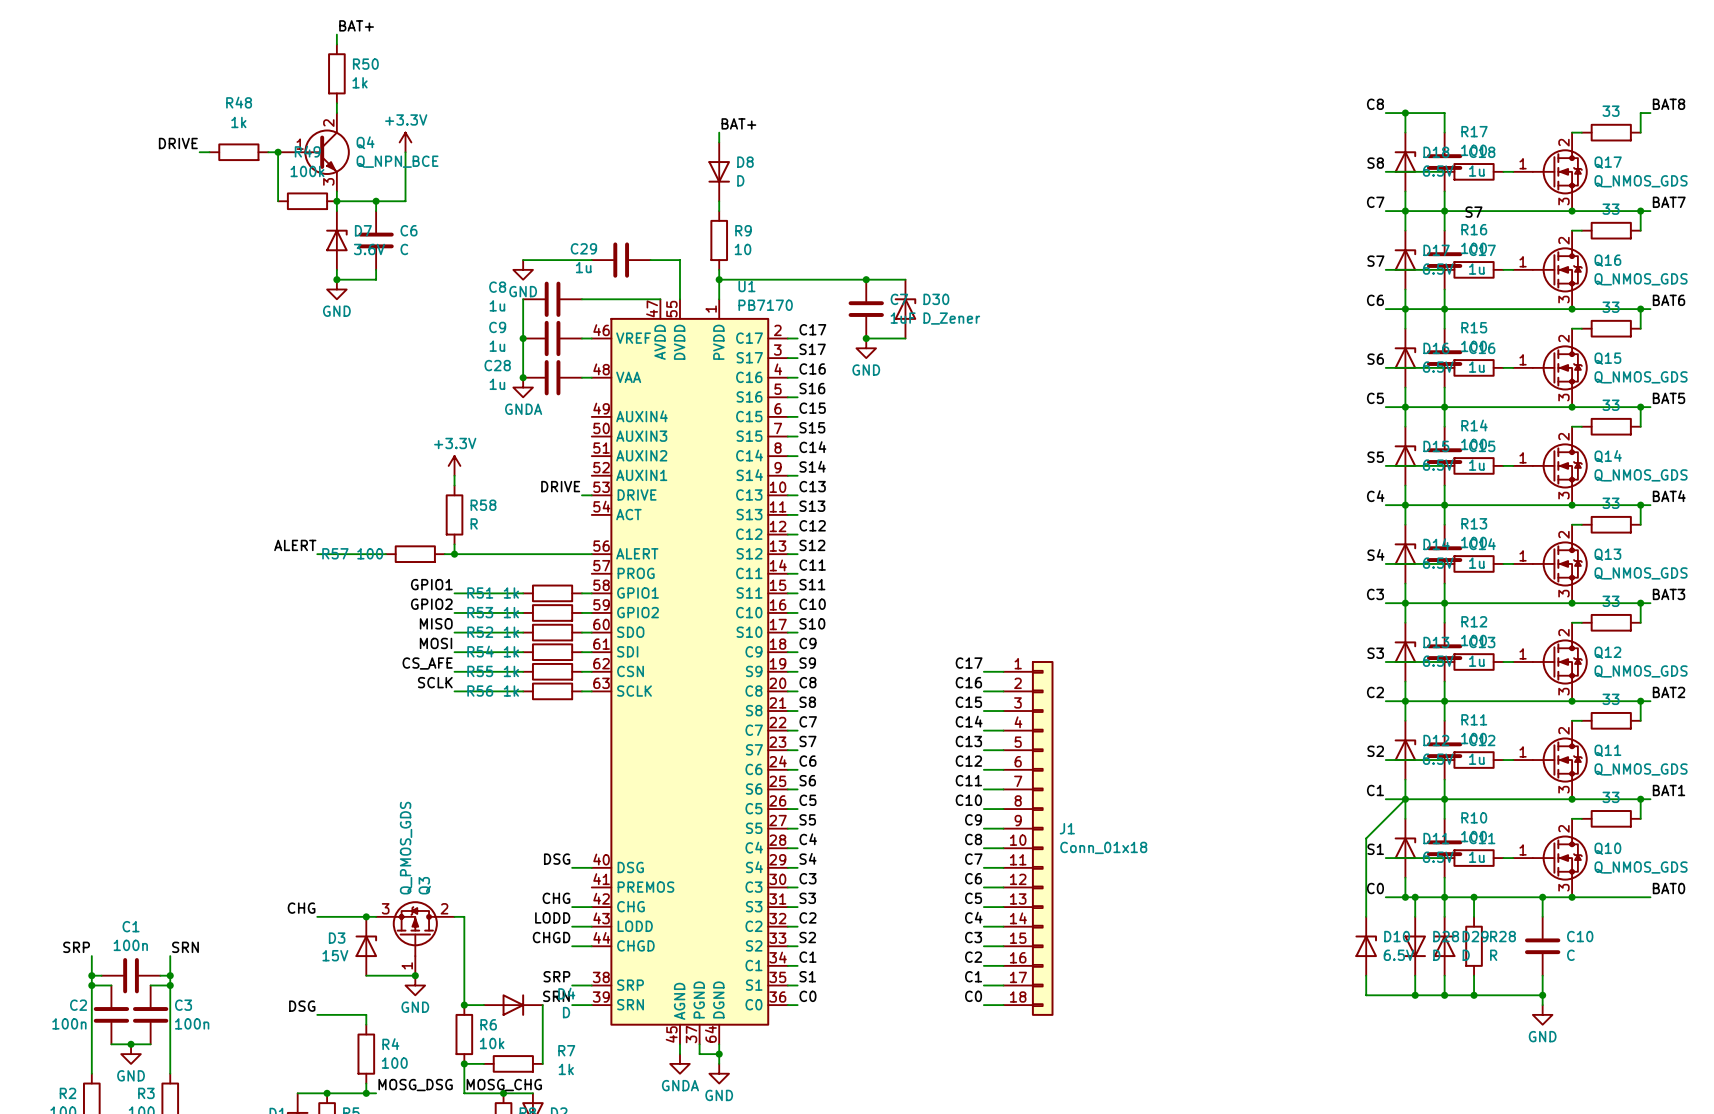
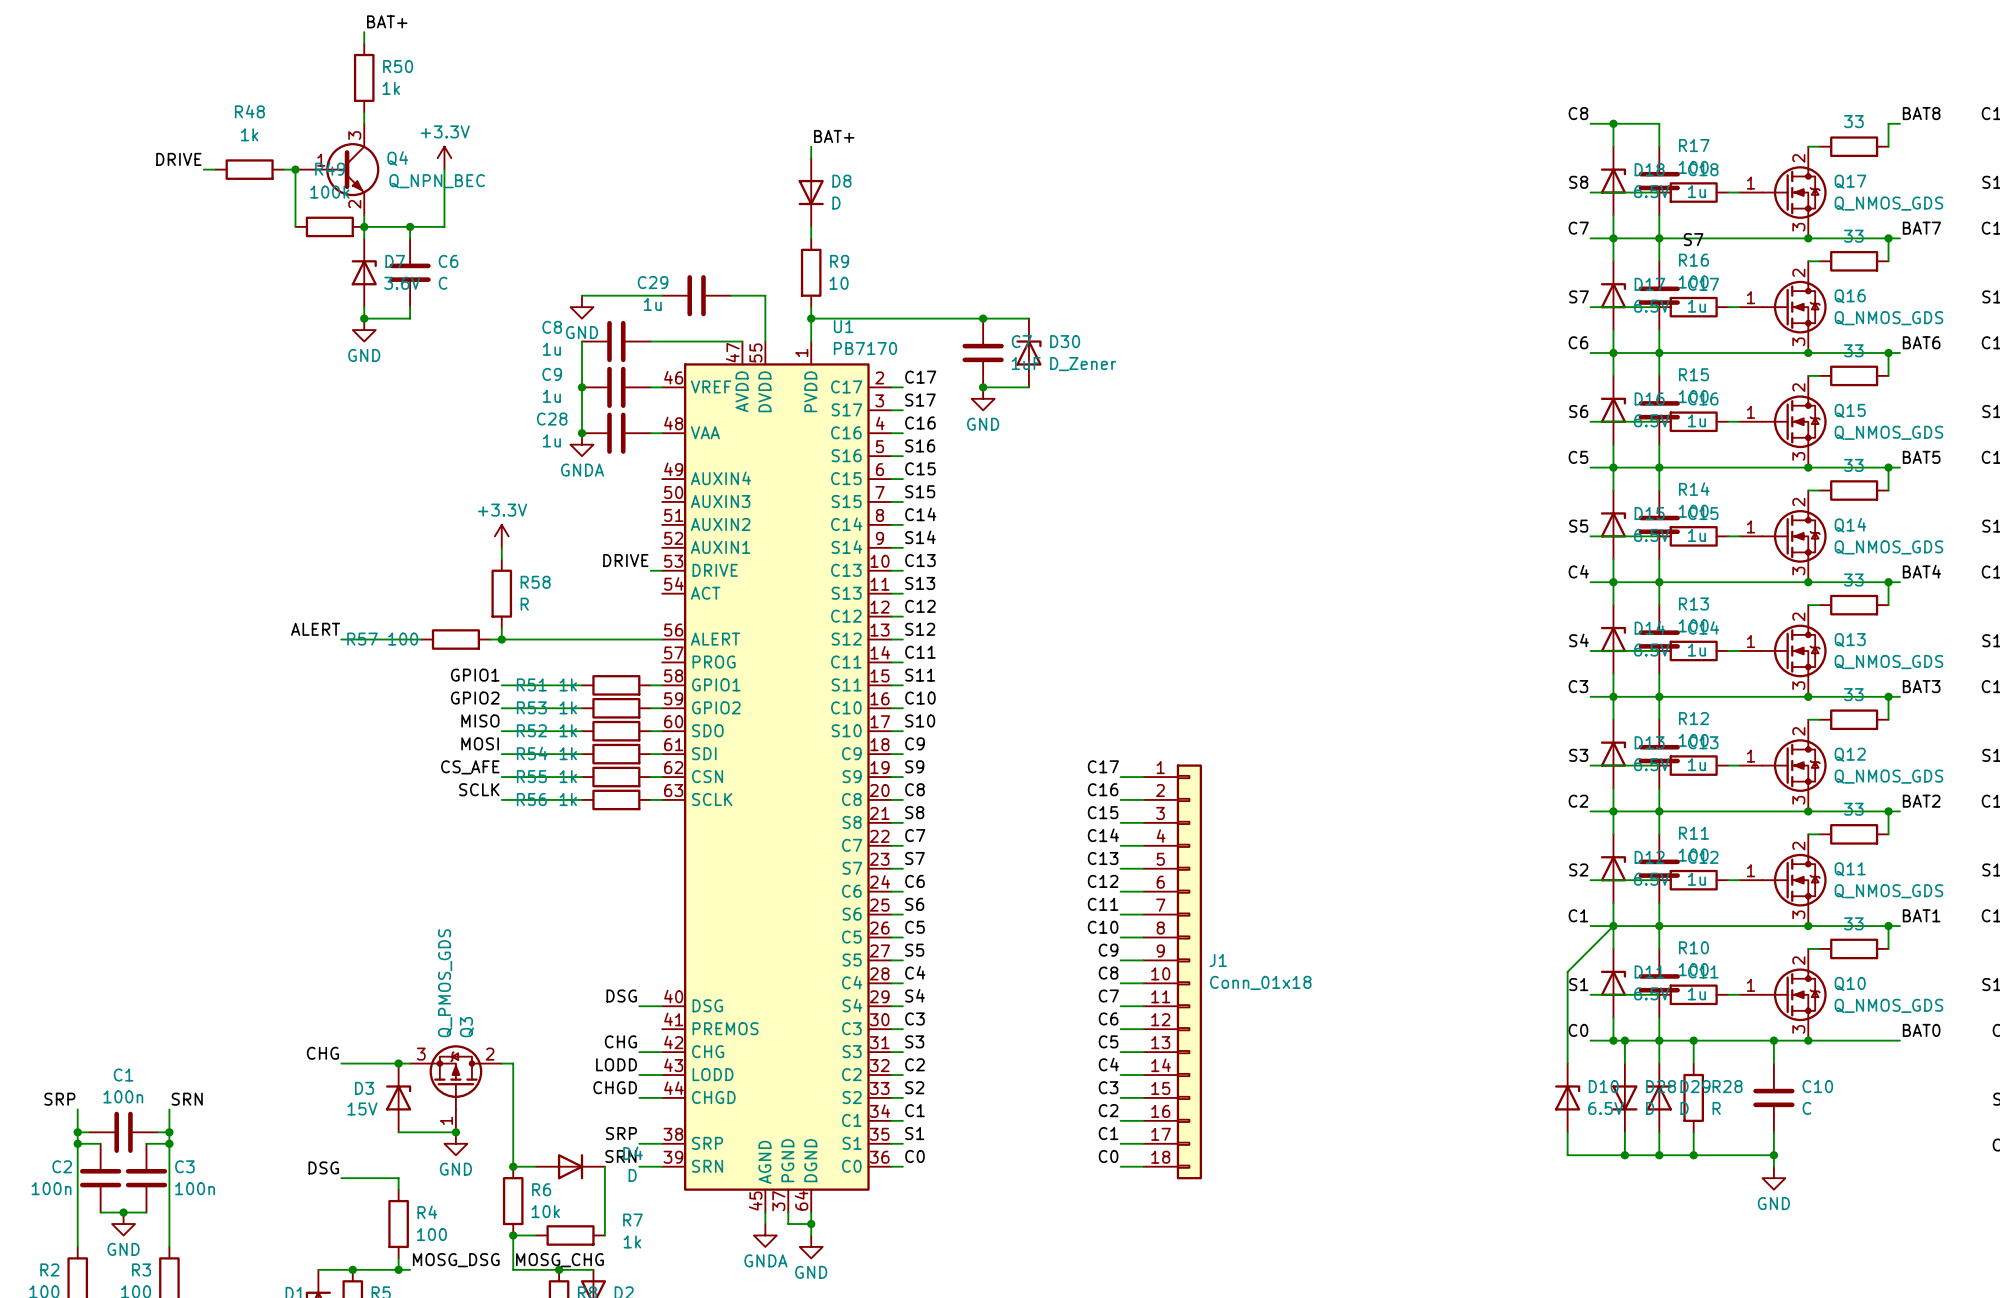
Q4 pin number: 2 (328, 123) -> 3 (354, 135)
Q4 value: Q_NPN_BCE (397, 161) -> Q_NPN_BEC (437, 181)
Q4 pin number: 3 (328, 181) -> 2 (354, 204)

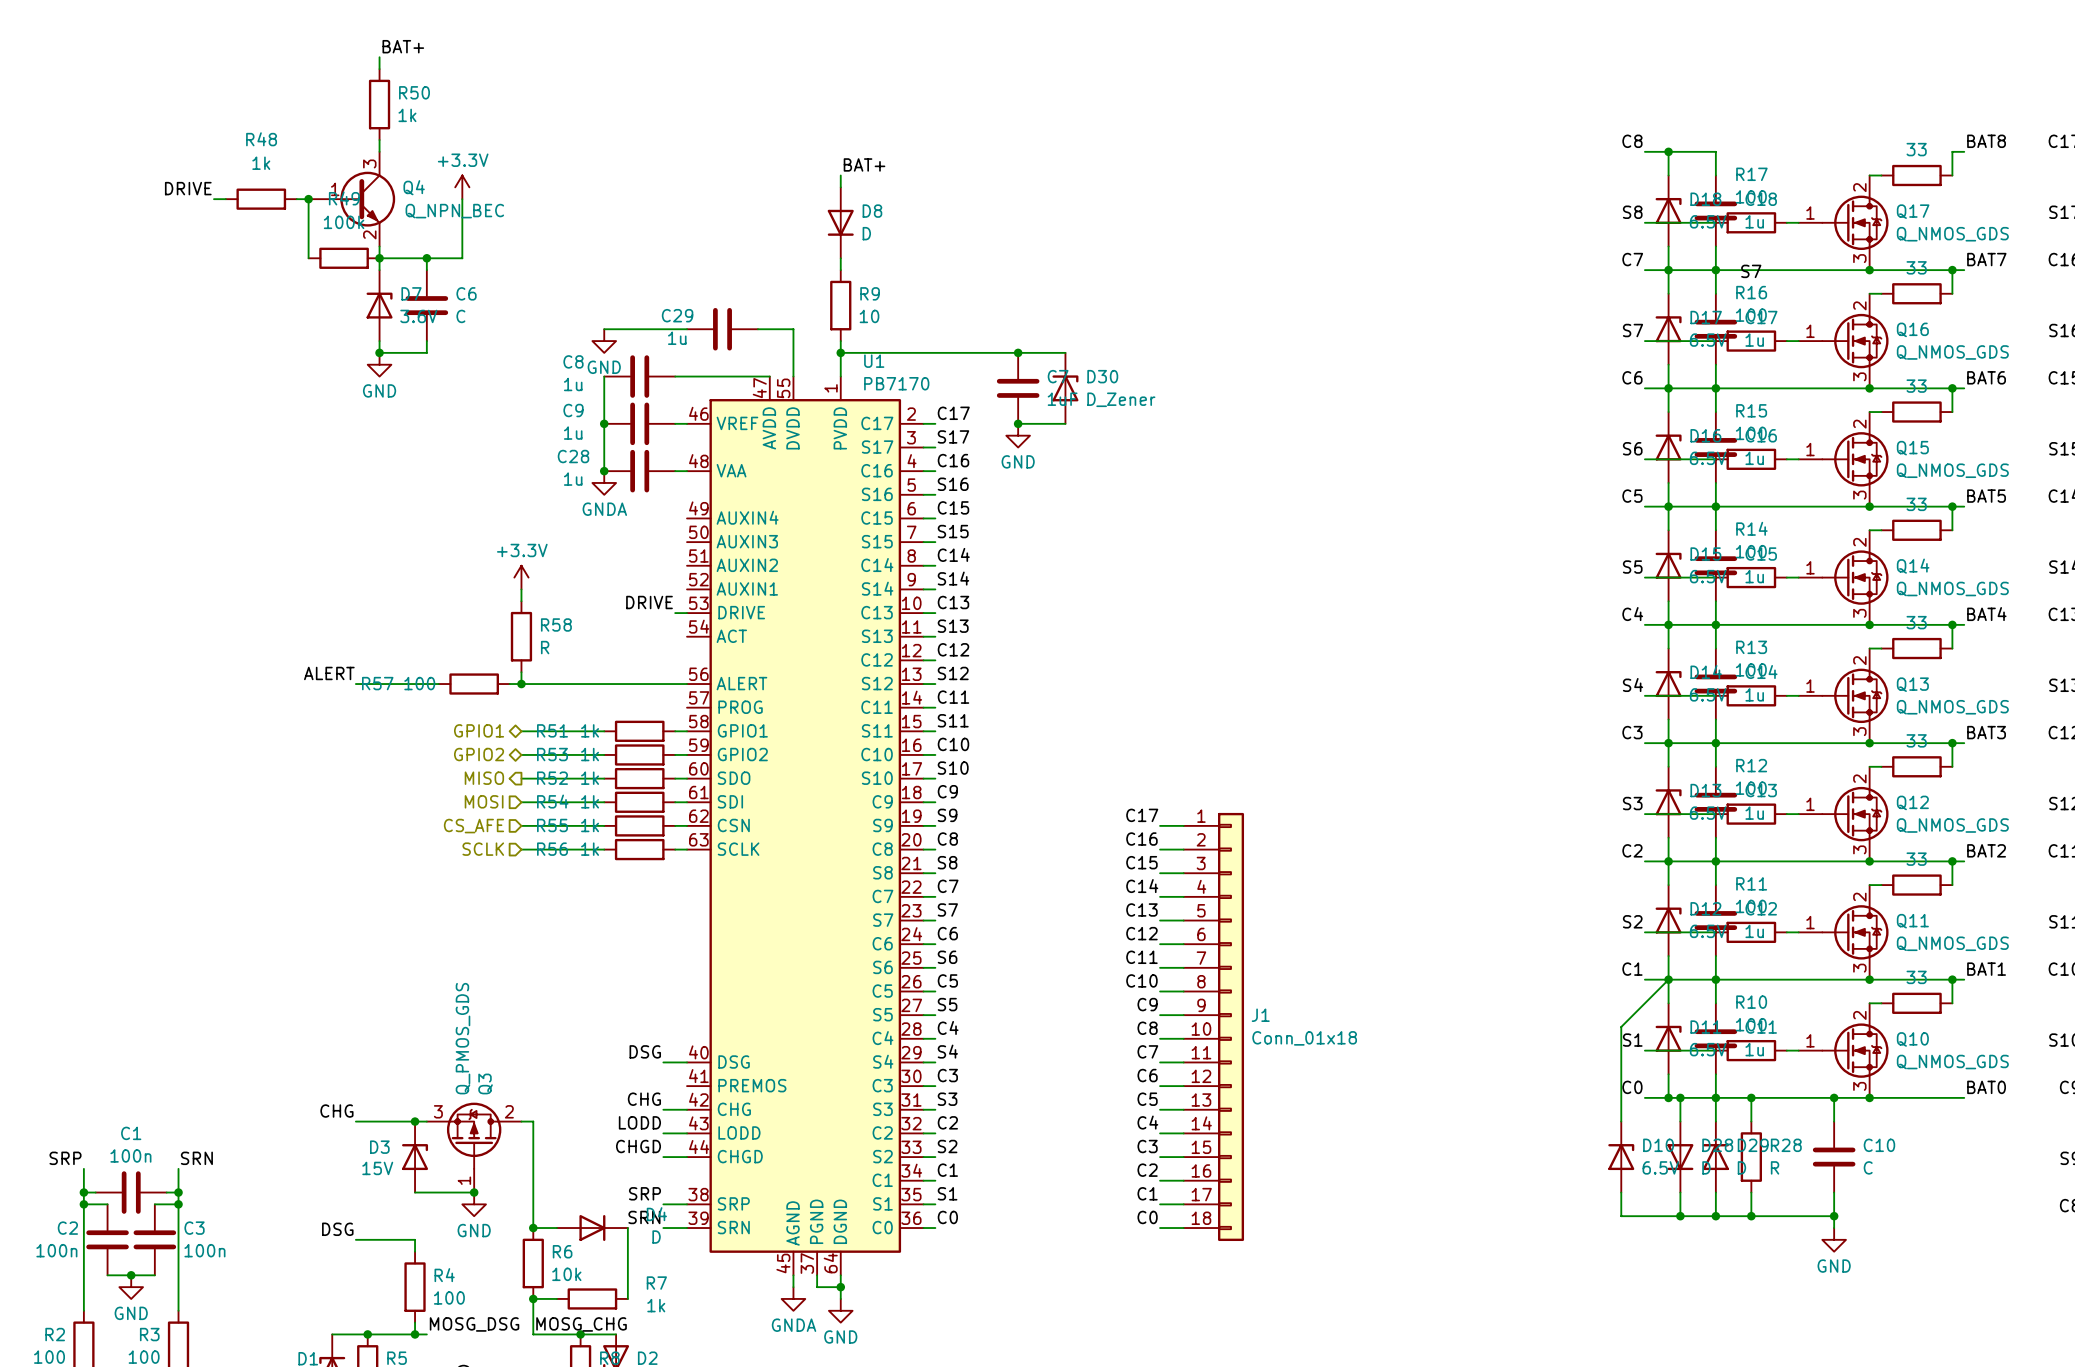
label: GPIO1 (475, 675) -> none
hierarchical label: none -> GPIO1 (479, 730)
label: GPIO2 (475, 698) -> none
hierarchical label: none -> GPIO2 (479, 754)
label: MISO (480, 720) -> none
hierarchical label: none -> MISO (484, 778)
label: MOSI (480, 743) -> none
hierarchical label: none -> MOSI (484, 801)
label: CS_AFE (470, 767) -> none
hierarchical label: none -> CS_AFE (473, 826)
label: SCLK (479, 789) -> none
hierarchical label: none -> SCLK (483, 849)

